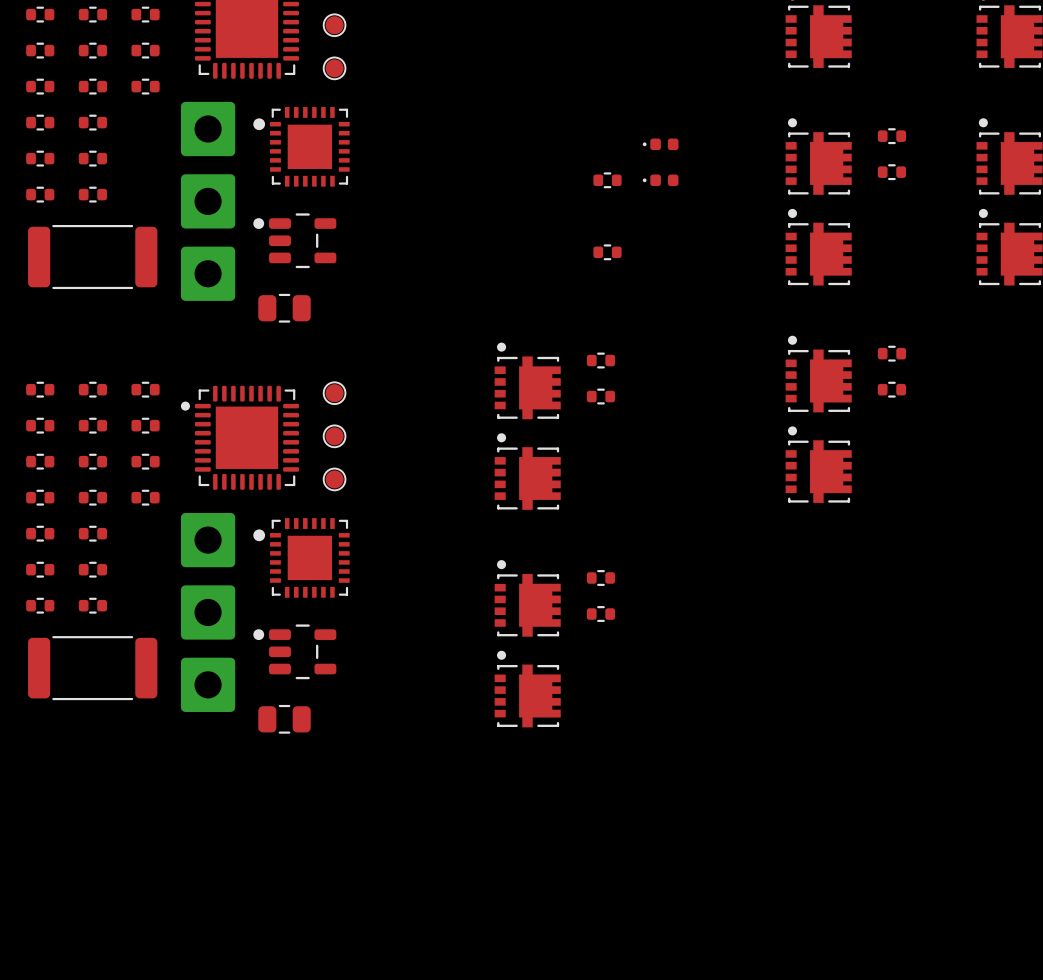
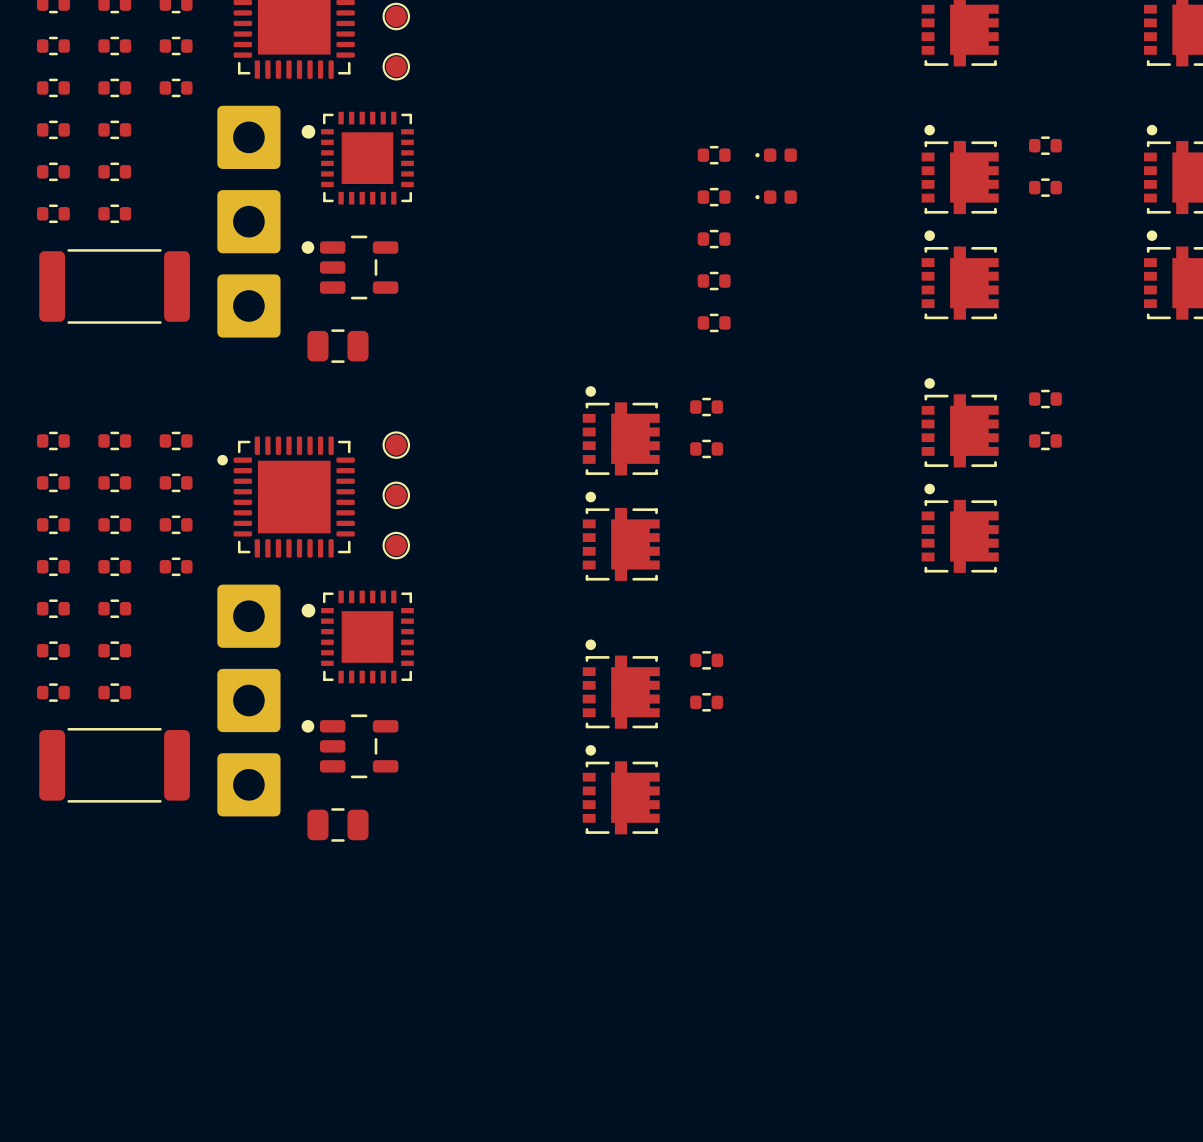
part: none -> (714, 155)
part: none -> (714, 239)
part: none -> (714, 322)

